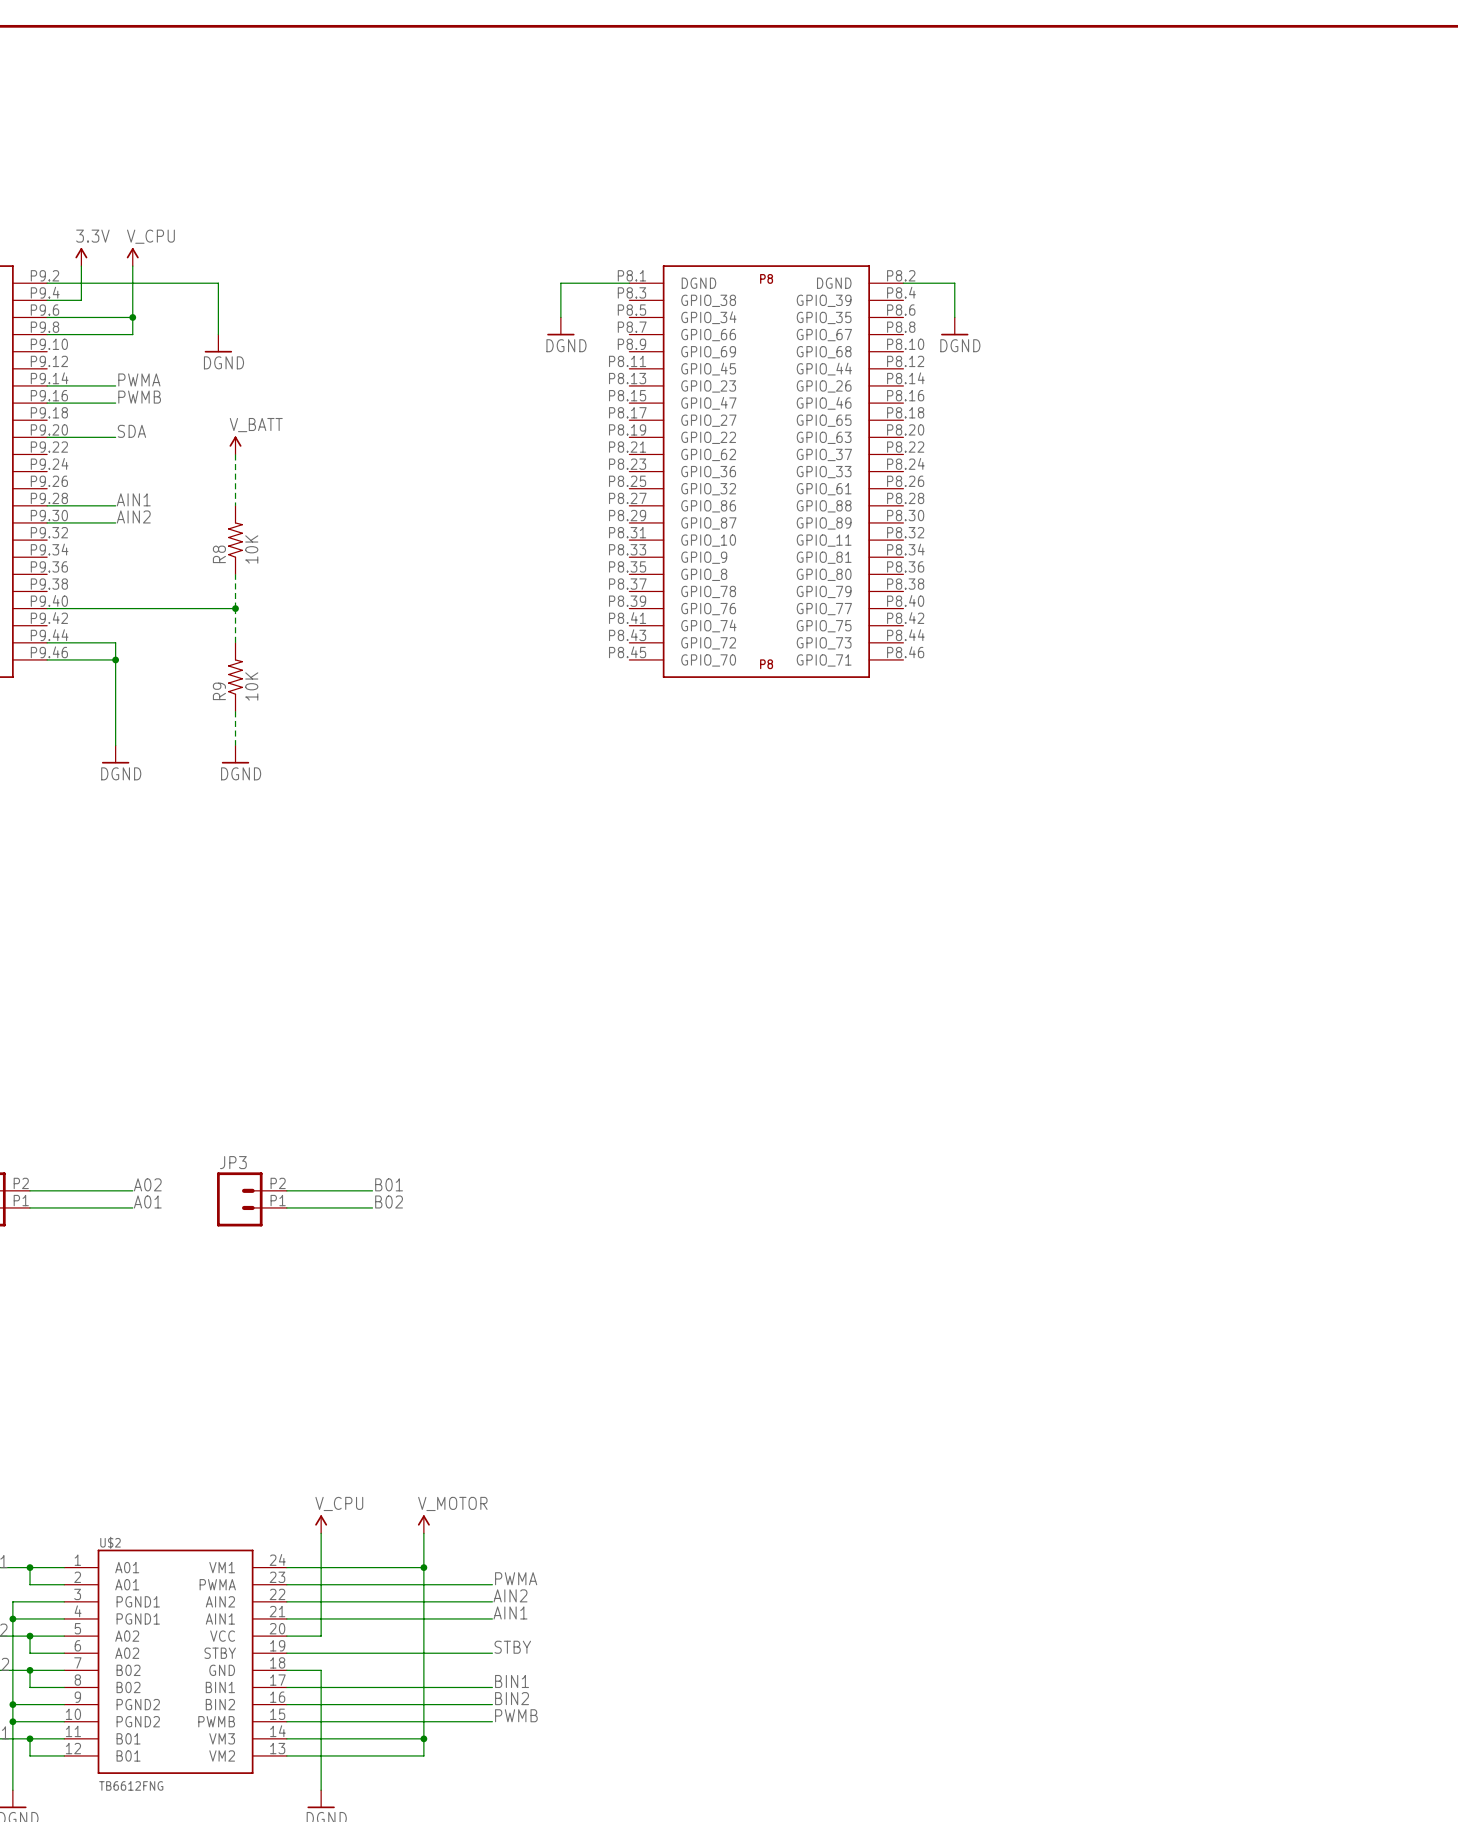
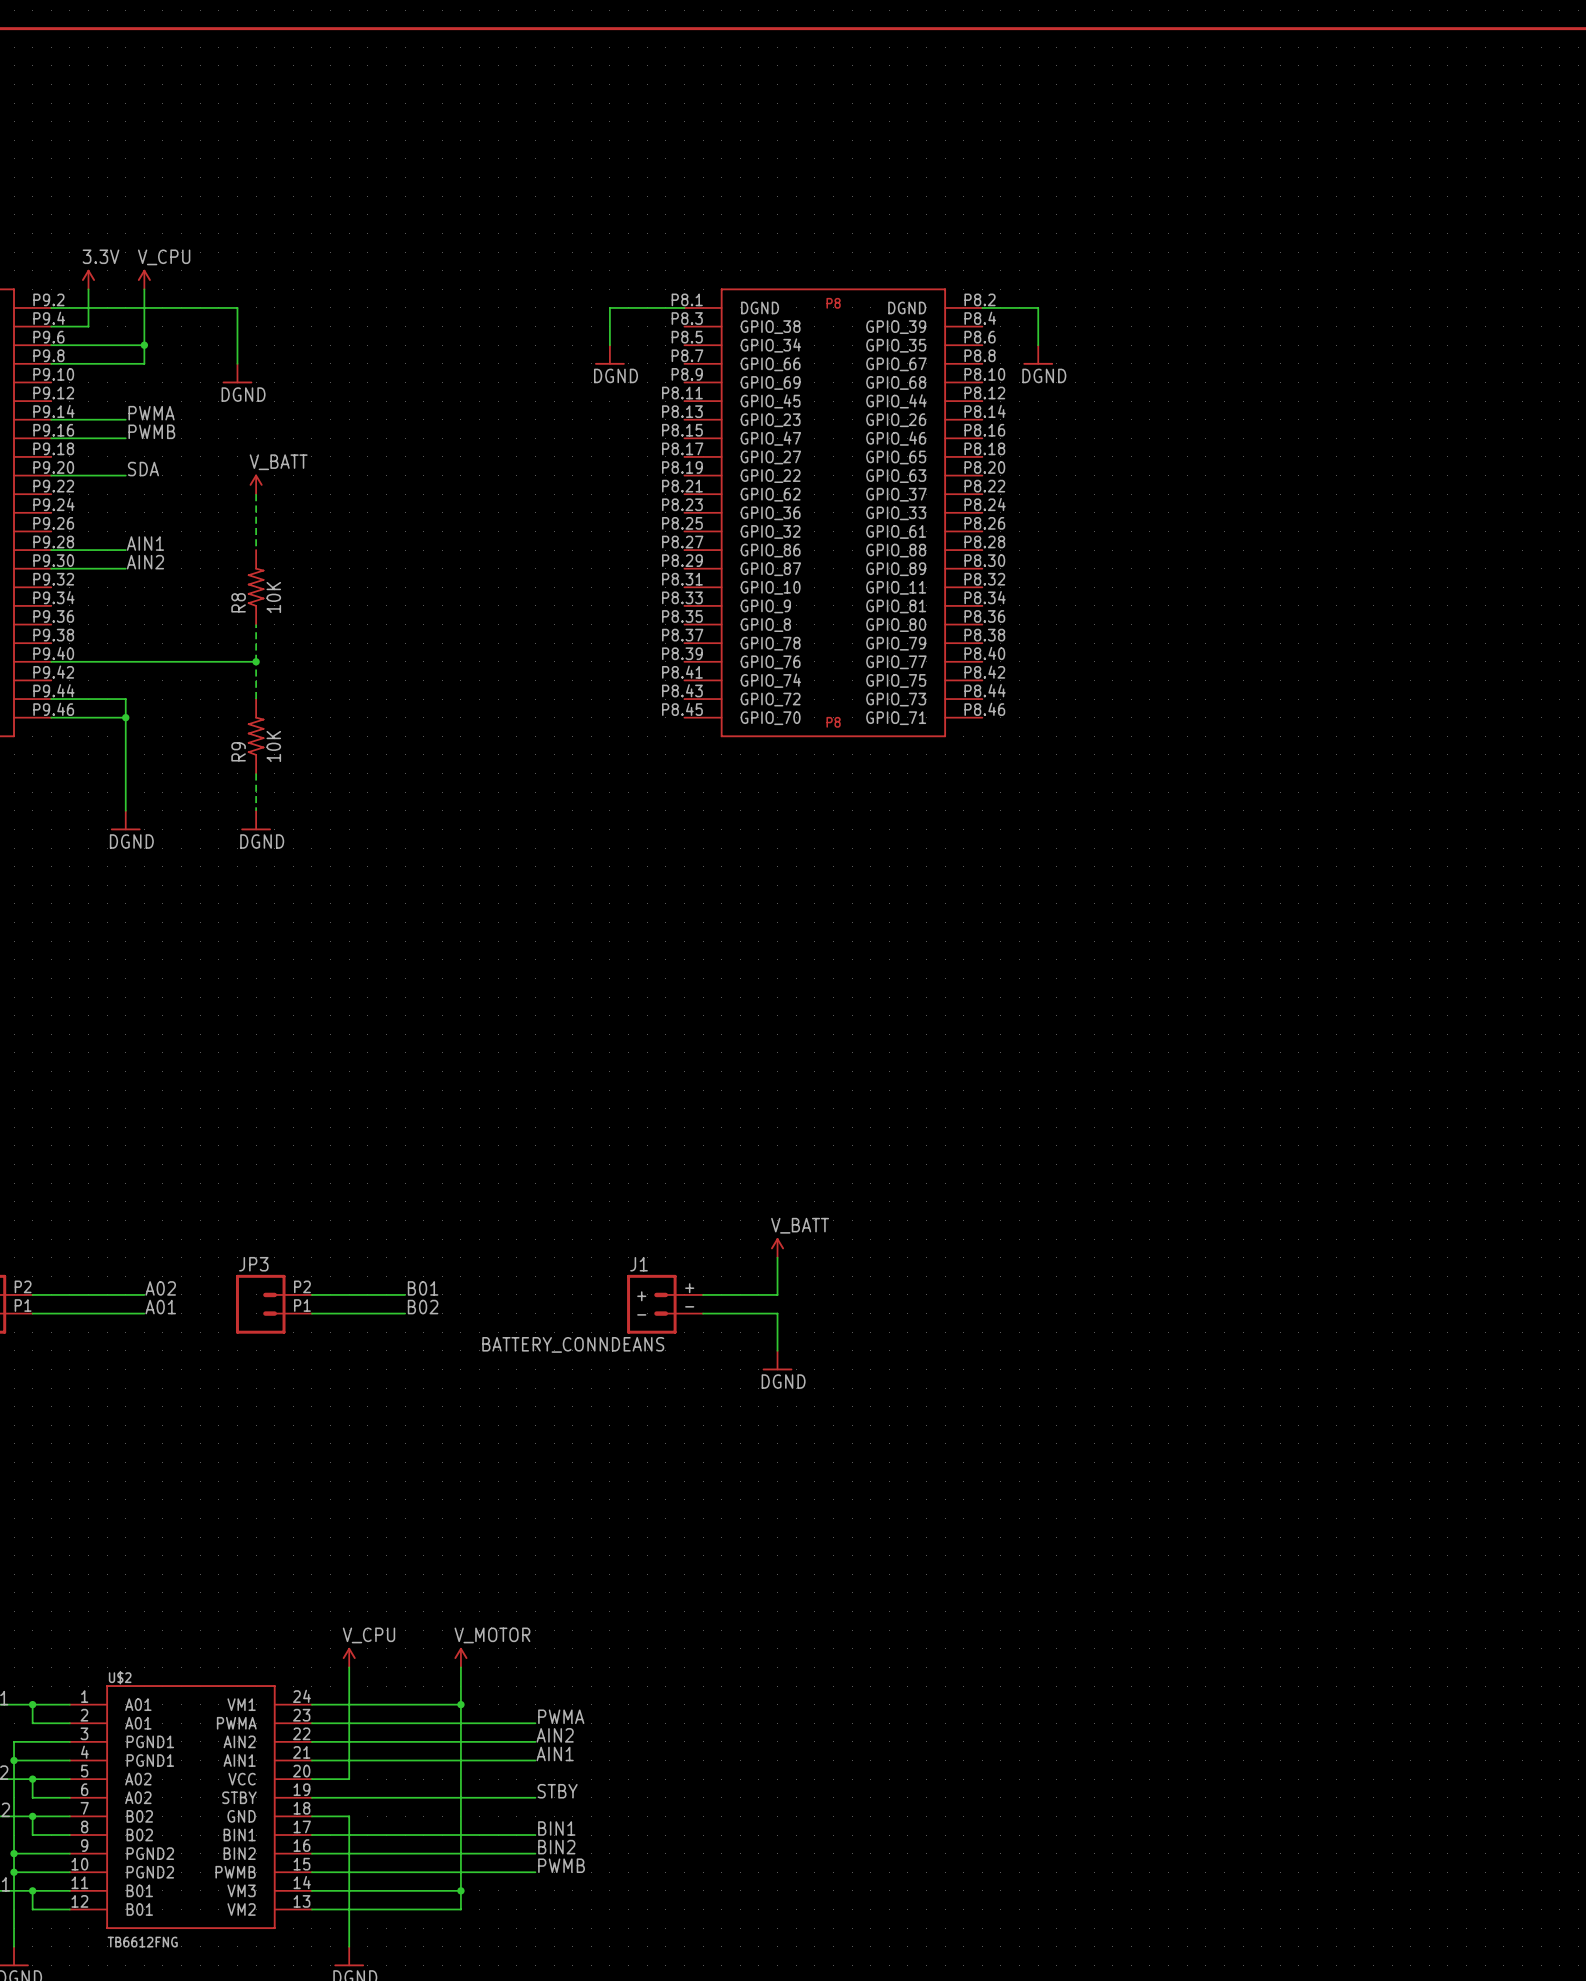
power symbol: none -> V_BATT (777, 1247)
wire: none -> (777, 1257) (777, 1294) (703, 1294)
J1: none -> BATTERY_CONNDEANS (665, 1304)
wire: none -> (703, 1313) (777, 1313) (777, 1350)
power symbol: none -> DGND (777, 1360)

